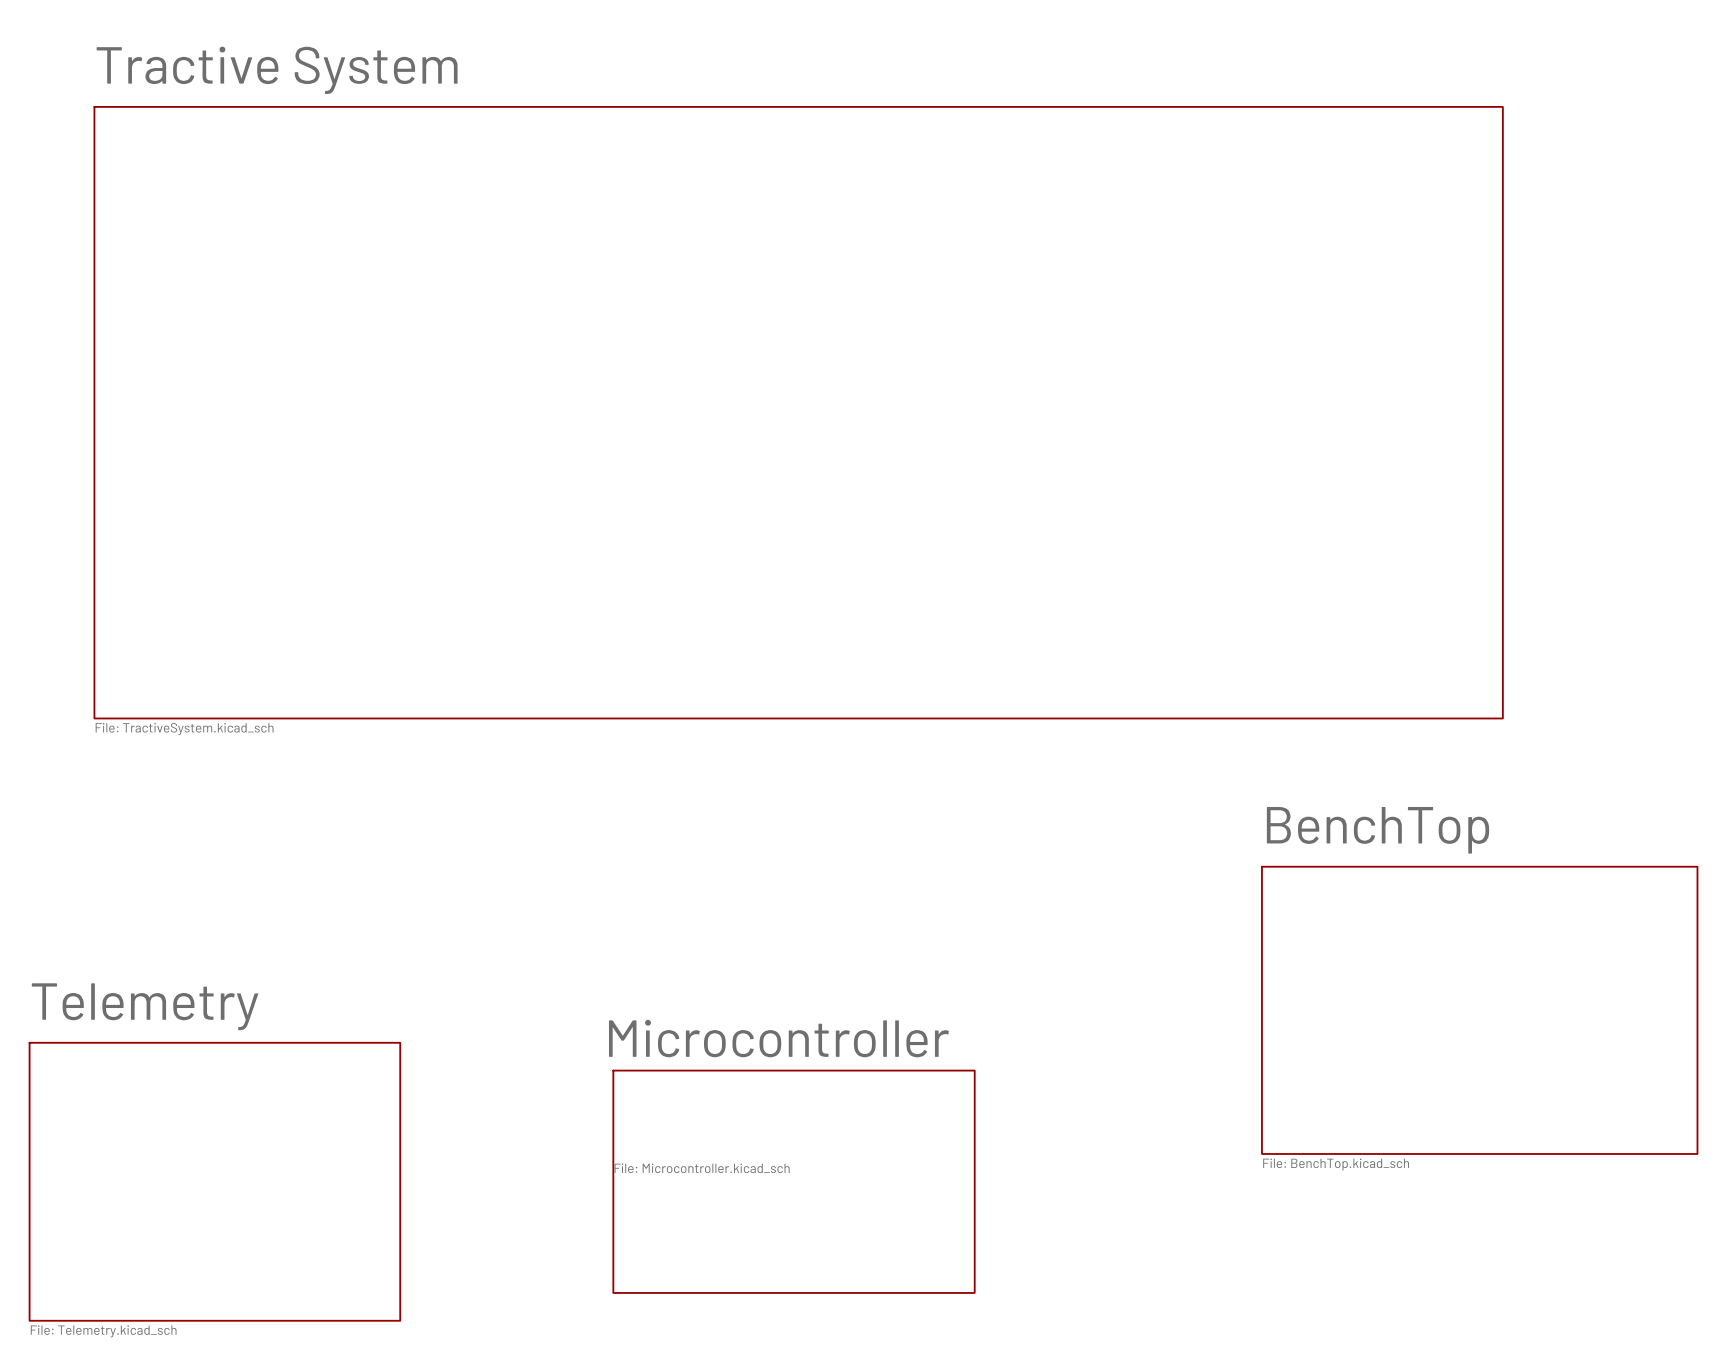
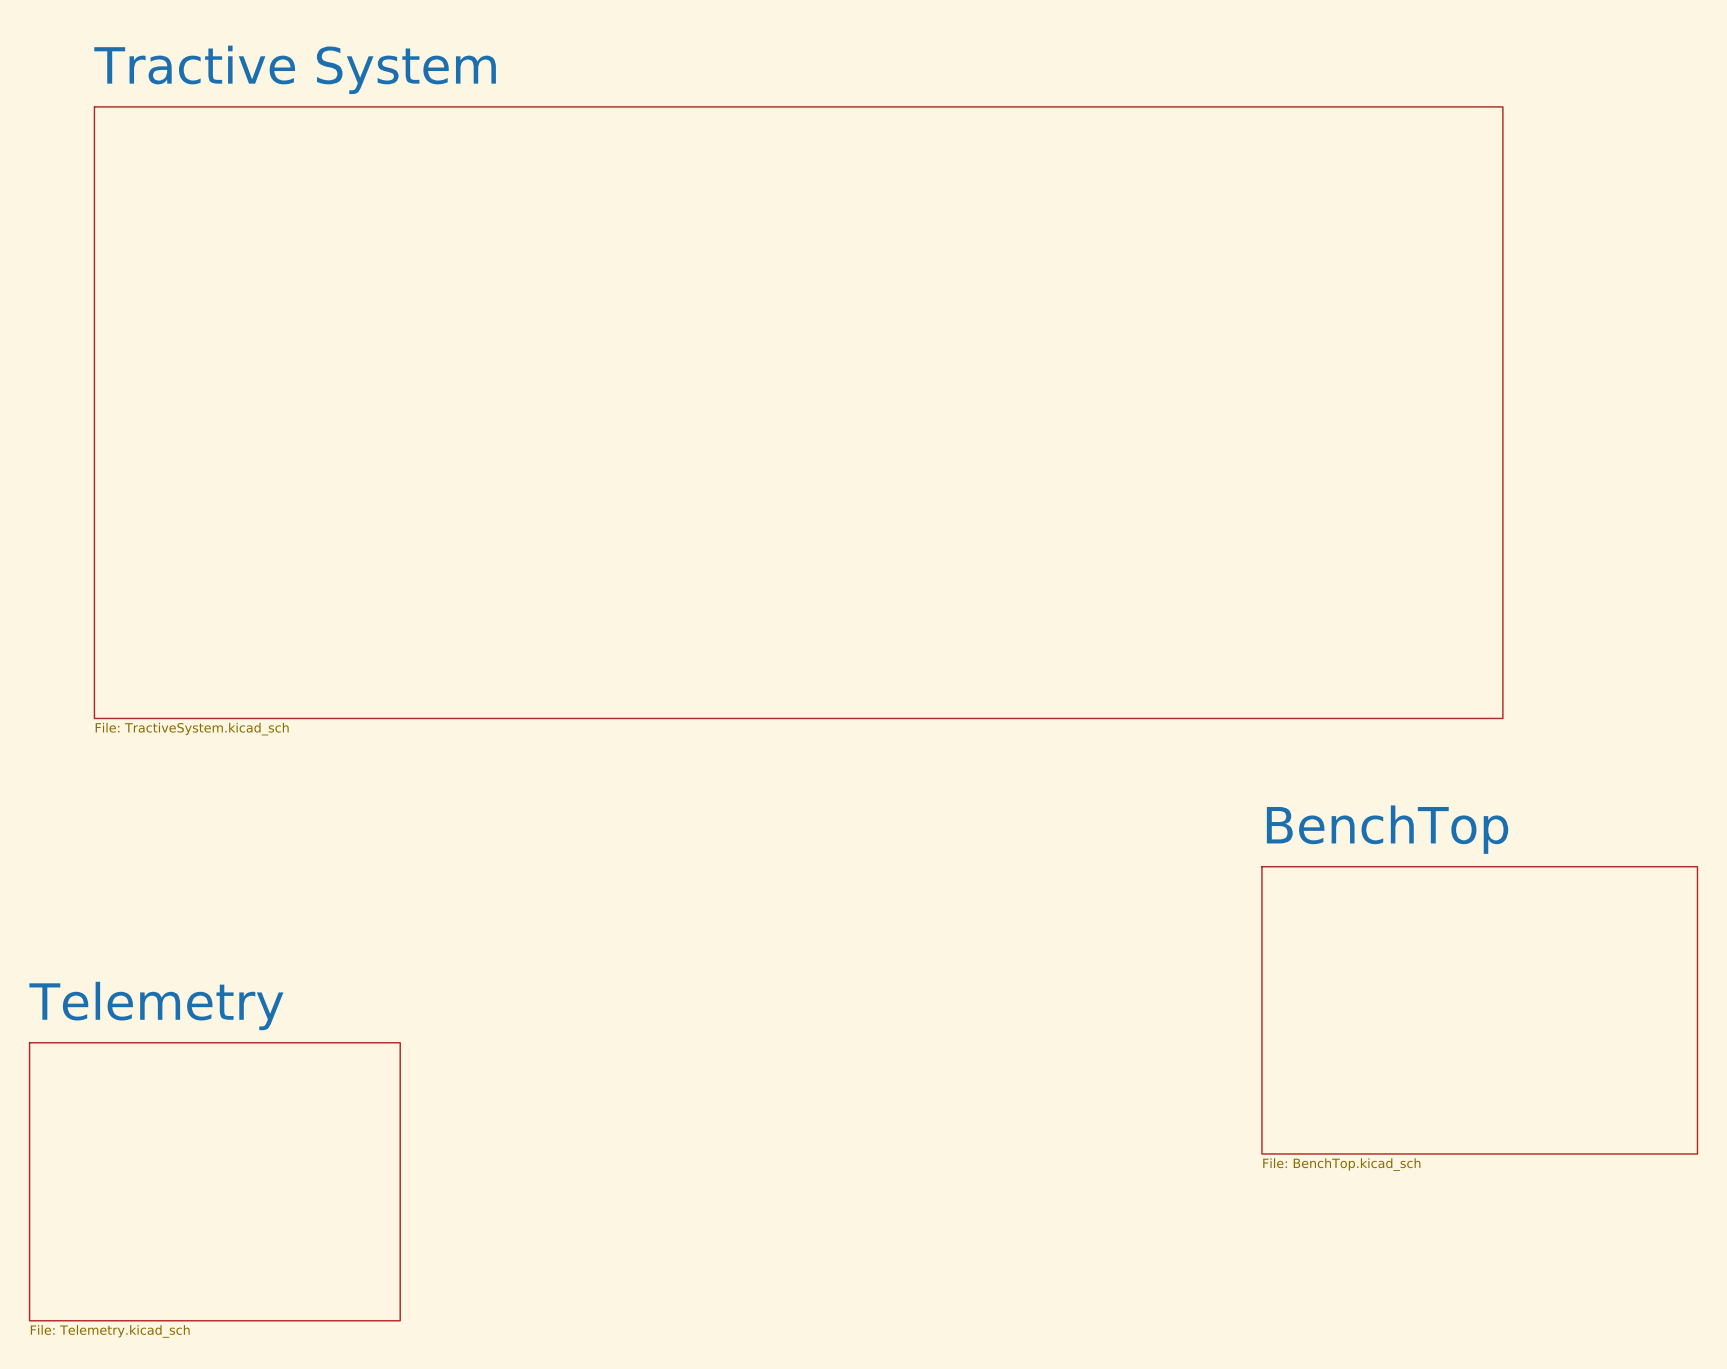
sheet Microcontroller: File: Microcontroller.kicad_sch (794, 1181) -> none

